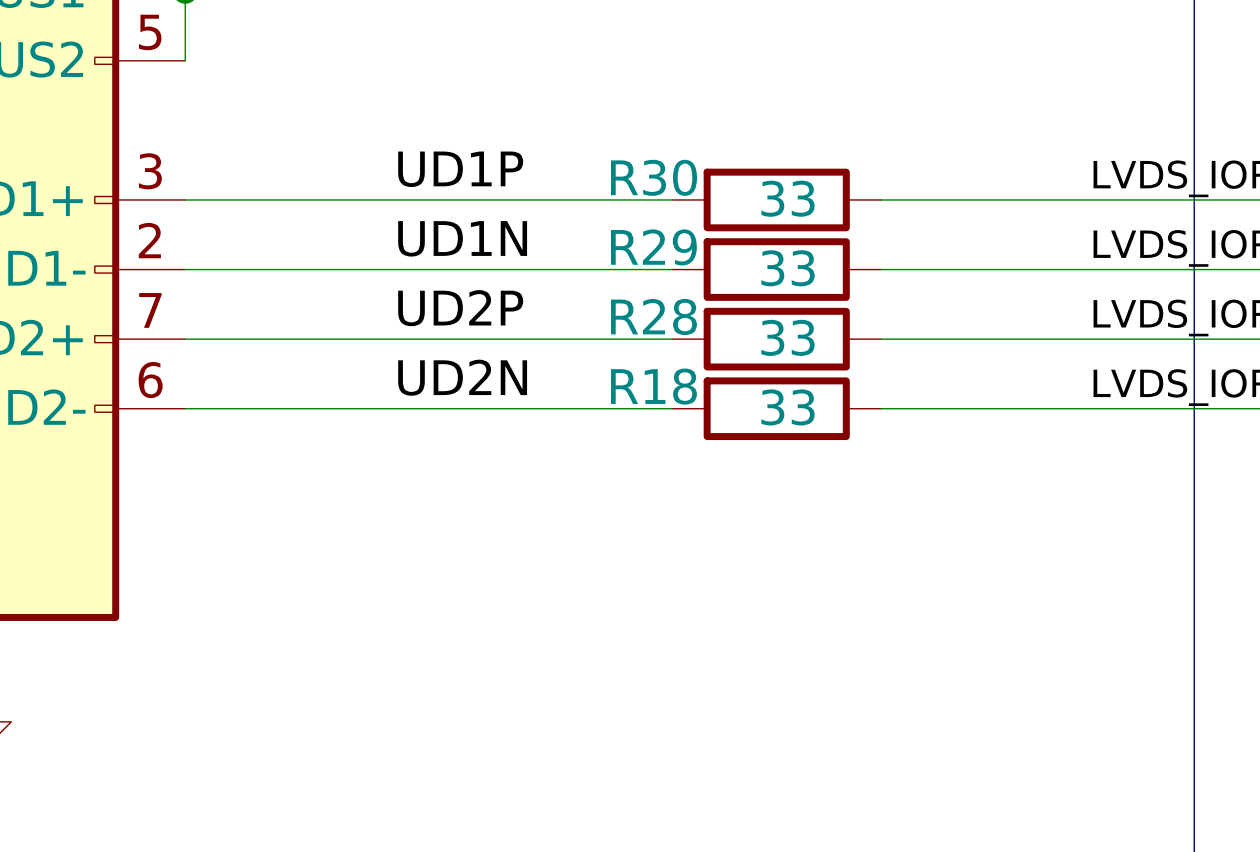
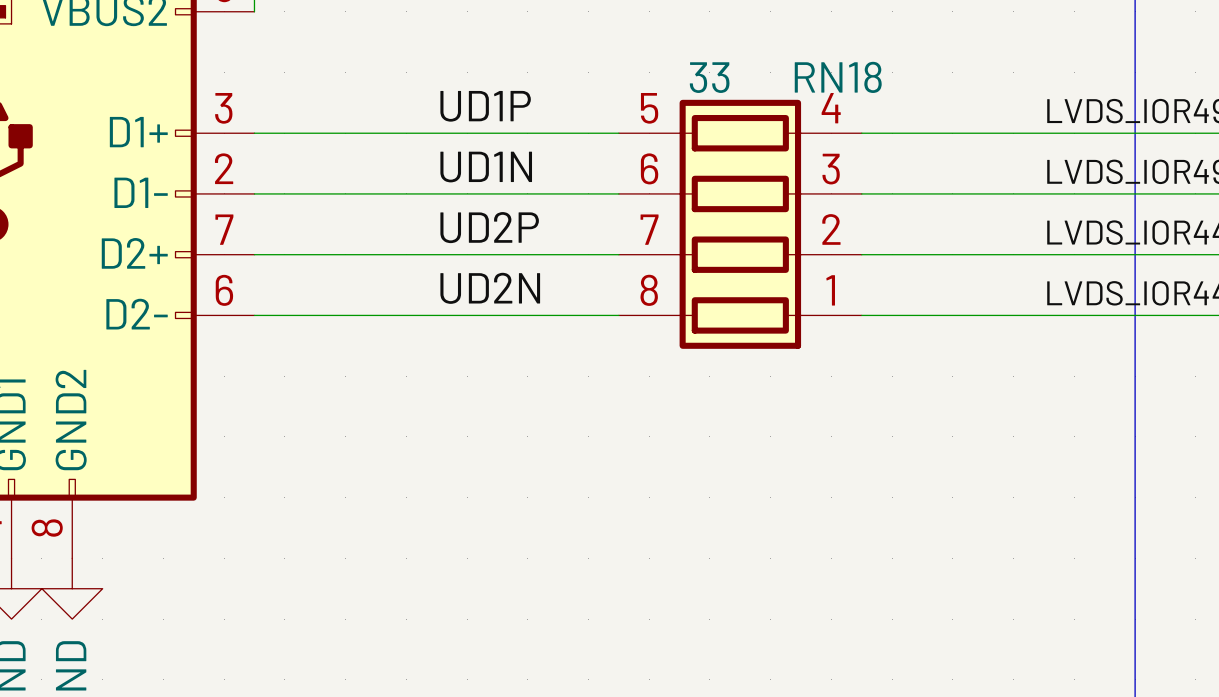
R30: 33 (776, 199) -> none
R29: 33 (776, 269) -> none
RN18: none -> 33 (740, 224)
R28: 33 (776, 339) -> none
R18: 33 (776, 408) -> none

